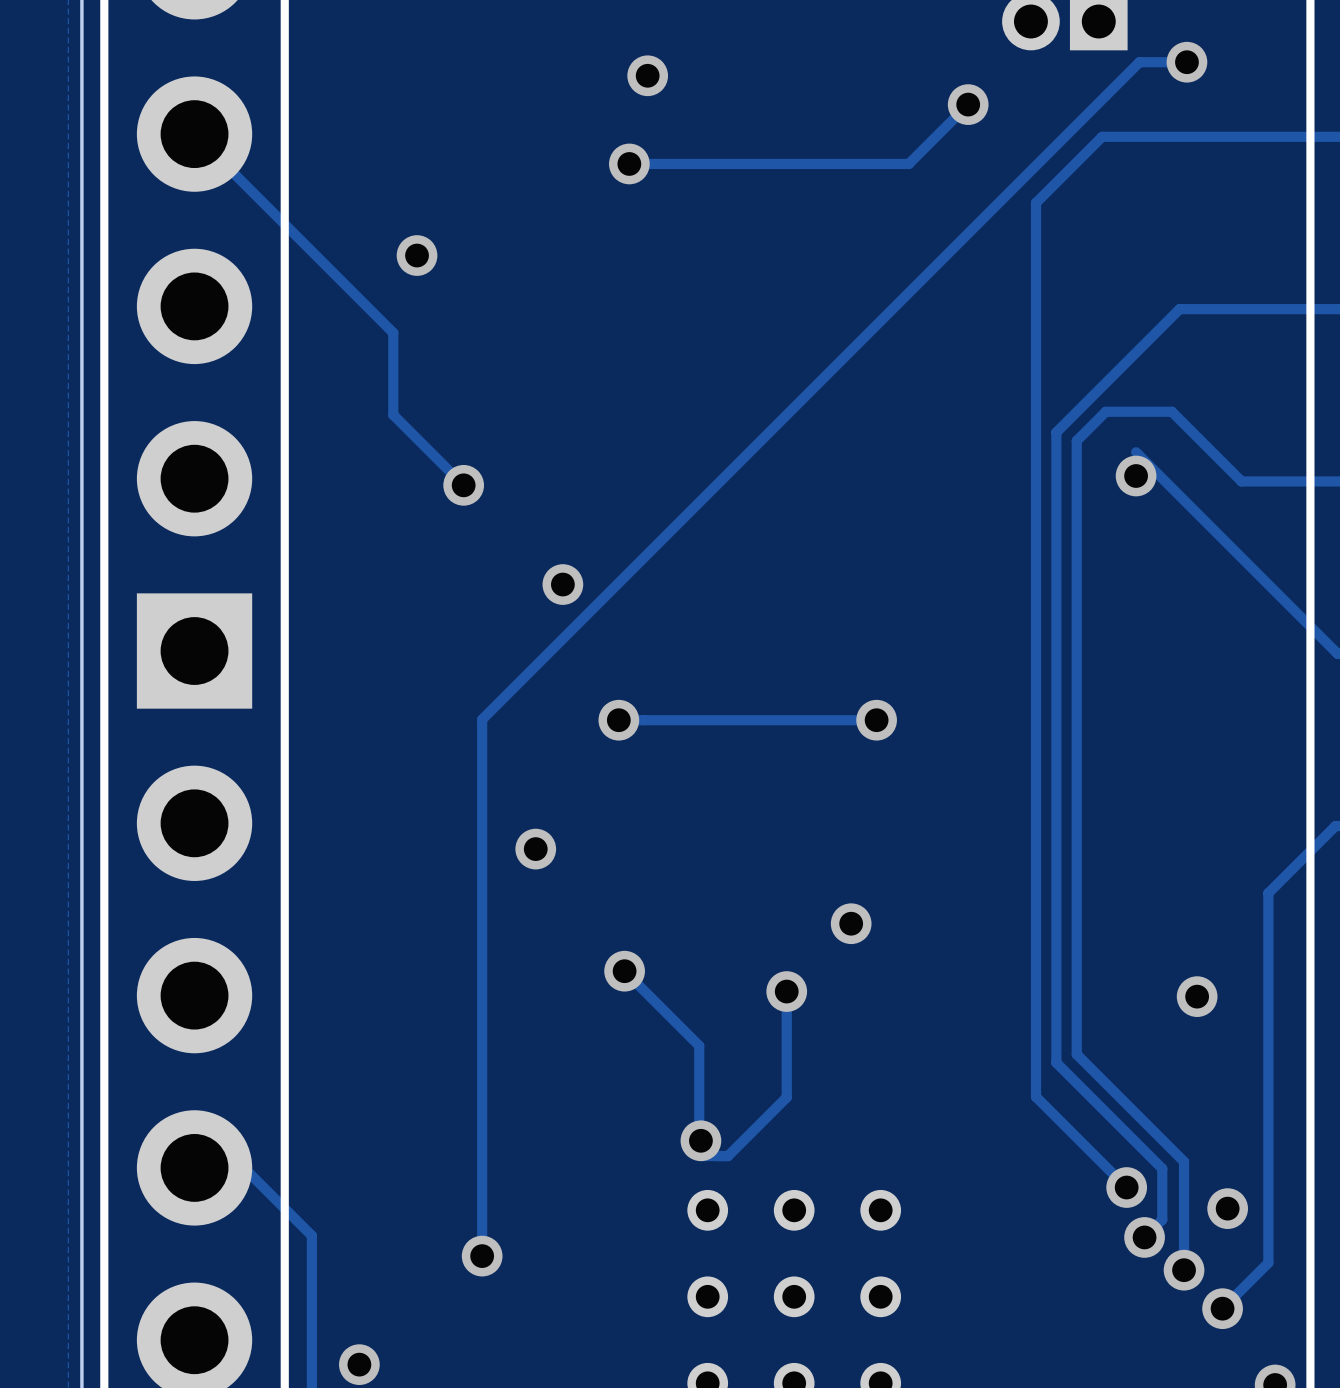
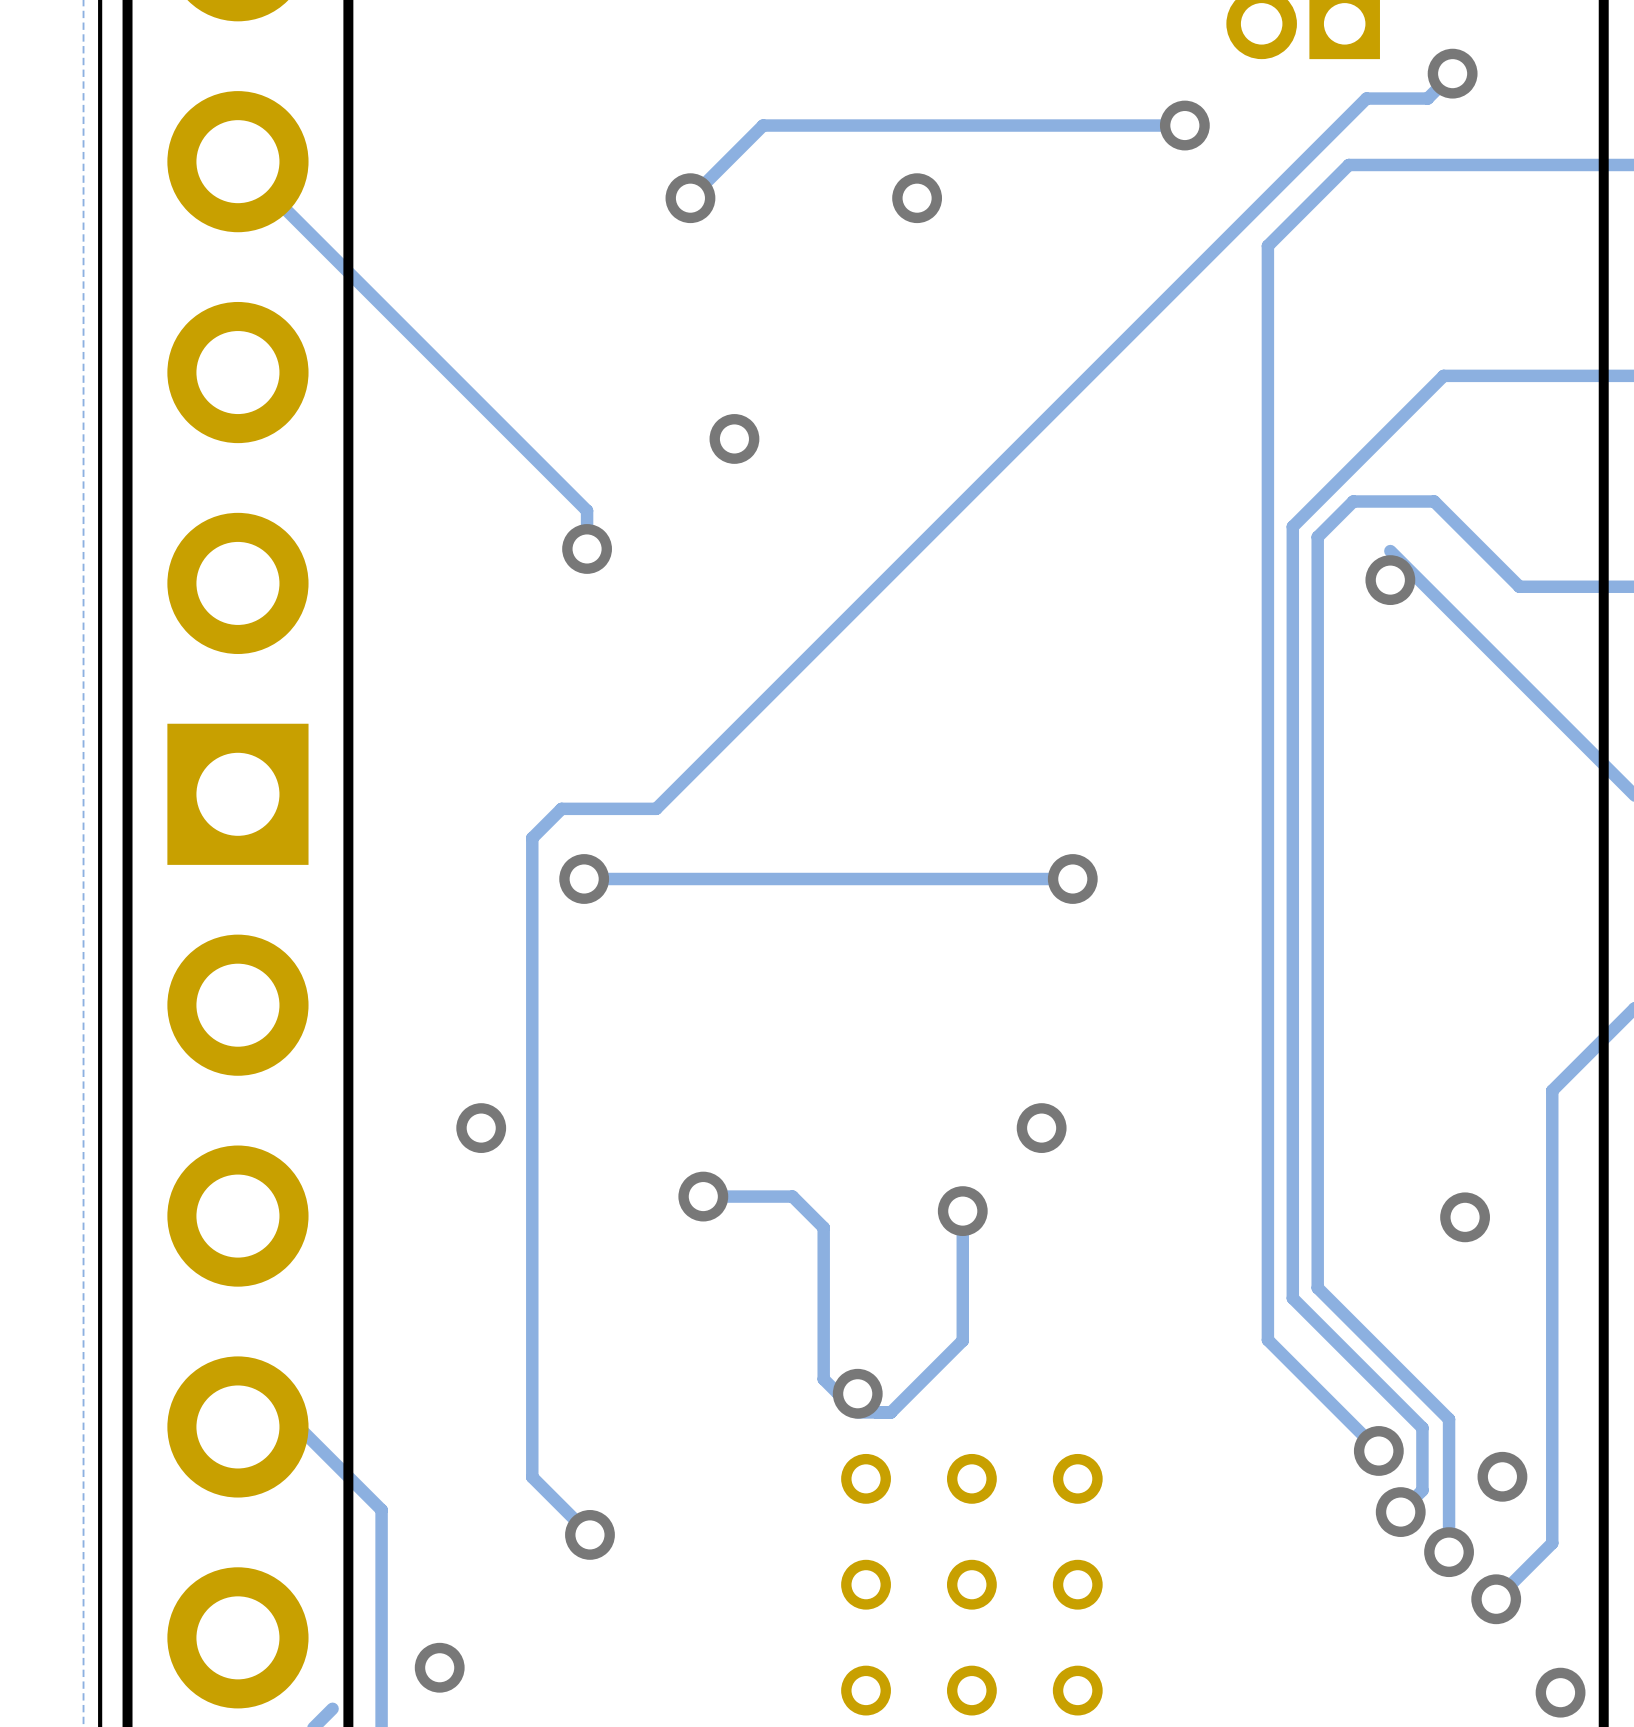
track: (1186, 62) (1139, 62) (482, 719) (482, 1256) -> (1452, 73) (1427, 98) (1366, 98) (656, 808) (561, 808) (532, 838) (532, 1477) (589, 1534)
via: (647, 75) -> none
track: (968, 104) (908, 163) (629, 163) -> (1184, 125) (763, 125) (690, 198)
via: none -> (690, 198)
via: (629, 163) -> none
via: none -> (917, 198)
via: (417, 255) -> none
track: (393, 332) (393, 414) (463, 485) -> (481, 404) (587, 510) (587, 548)
via: none -> (734, 438)
via position: (463, 485) -> (587, 548)
via: (562, 584) -> none
via: none -> (584, 879)
track: none -> (757, 879) (584, 879)
via: (618, 720) -> none
via: (535, 849) -> none
via: none -> (481, 1128)
track: (624, 971) (699, 1045) (699, 1139) (700, 1140) -> (703, 1196) (792, 1196) (823, 1227) (823, 1379) (838, 1393) (857, 1393)
via position: (624, 971) -> (703, 1196)

